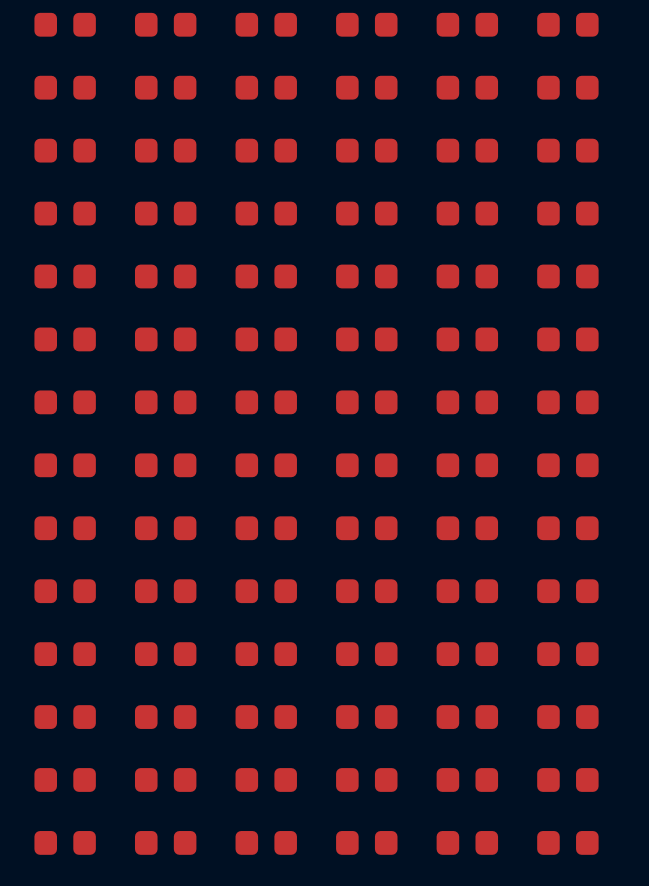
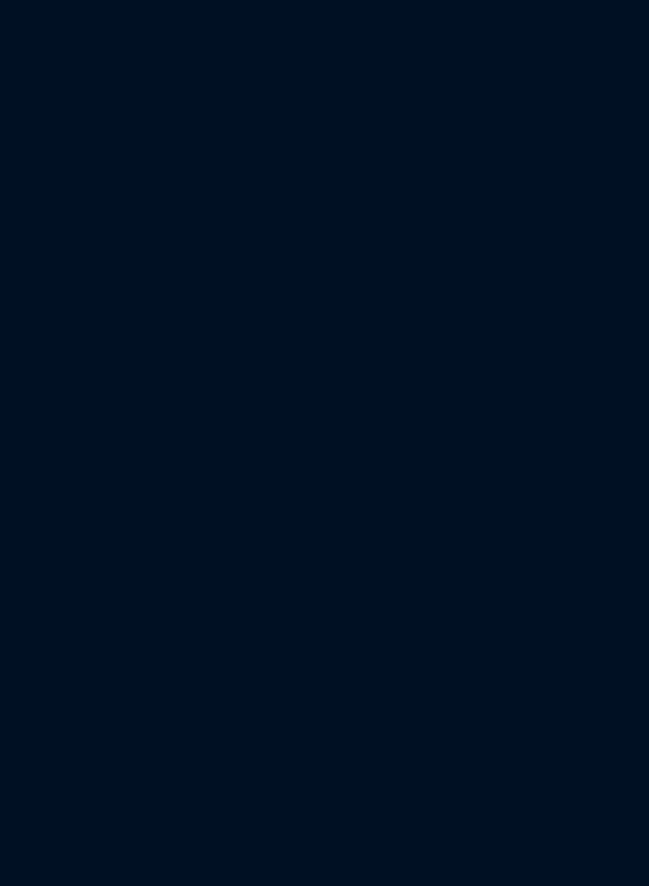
part: (65, 24) -> none
part: (165, 24) -> none
part: (266, 24) -> none
part: (366, 24) -> none
part: (467, 24) -> none
part: (567, 24) -> none
part: (65, 87) -> none
part: (165, 87) -> none
part: (266, 87) -> none
part: (366, 87) -> none
part: (467, 87) -> none
part: (567, 87) -> none
part: (65, 150) -> none
part: (165, 150) -> none
part: (266, 150) -> none
part: (366, 150) -> none
part: (467, 150) -> none
part: (567, 150) -> none
part: (65, 213) -> none
part: (165, 213) -> none
part: (266, 213) -> none
part: (366, 213) -> none
part: (467, 213) -> none
part: (567, 213) -> none
part: (65, 276) -> none
part: (165, 276) -> none
part: (266, 276) -> none
part: (366, 276) -> none
part: (467, 276) -> none
part: (567, 276) -> none
part: (65, 339) -> none
part: (165, 339) -> none
part: (266, 339) -> none
part: (366, 339) -> none
part: (467, 339) -> none
part: (567, 339) -> none
part: (65, 402) -> none
part: (165, 402) -> none
part: (266, 402) -> none
part: (366, 402) -> none
part: (467, 402) -> none
part: (567, 402) -> none
part: (65, 465) -> none
part: (165, 465) -> none
part: (266, 465) -> none
part: (366, 465) -> none
part: (467, 465) -> none
part: (567, 465) -> none
part: (65, 528) -> none
part: (165, 528) -> none
part: (266, 528) -> none
part: (366, 528) -> none
part: (467, 528) -> none
part: (567, 528) -> none
part: (65, 591) -> none
part: (165, 591) -> none
part: (266, 591) -> none
part: (366, 591) -> none
part: (467, 591) -> none
part: (567, 591) -> none
part: (65, 654) -> none
part: (165, 654) -> none
part: (266, 654) -> none
part: (366, 654) -> none
part: (467, 654) -> none
part: (567, 654) -> none
part: (65, 717) -> none
part: (165, 717) -> none
part: (266, 717) -> none
part: (366, 717) -> none
part: (467, 717) -> none
part: (567, 717) -> none
part: (65, 779) -> none
part: (165, 779) -> none
part: (266, 779) -> none
part: (366, 779) -> none
part: (467, 779) -> none
part: (567, 779) -> none
part: (65, 842) -> none
part: (165, 842) -> none
part: (266, 842) -> none
part: (366, 842) -> none
part: (467, 842) -> none
part: (567, 842) -> none

